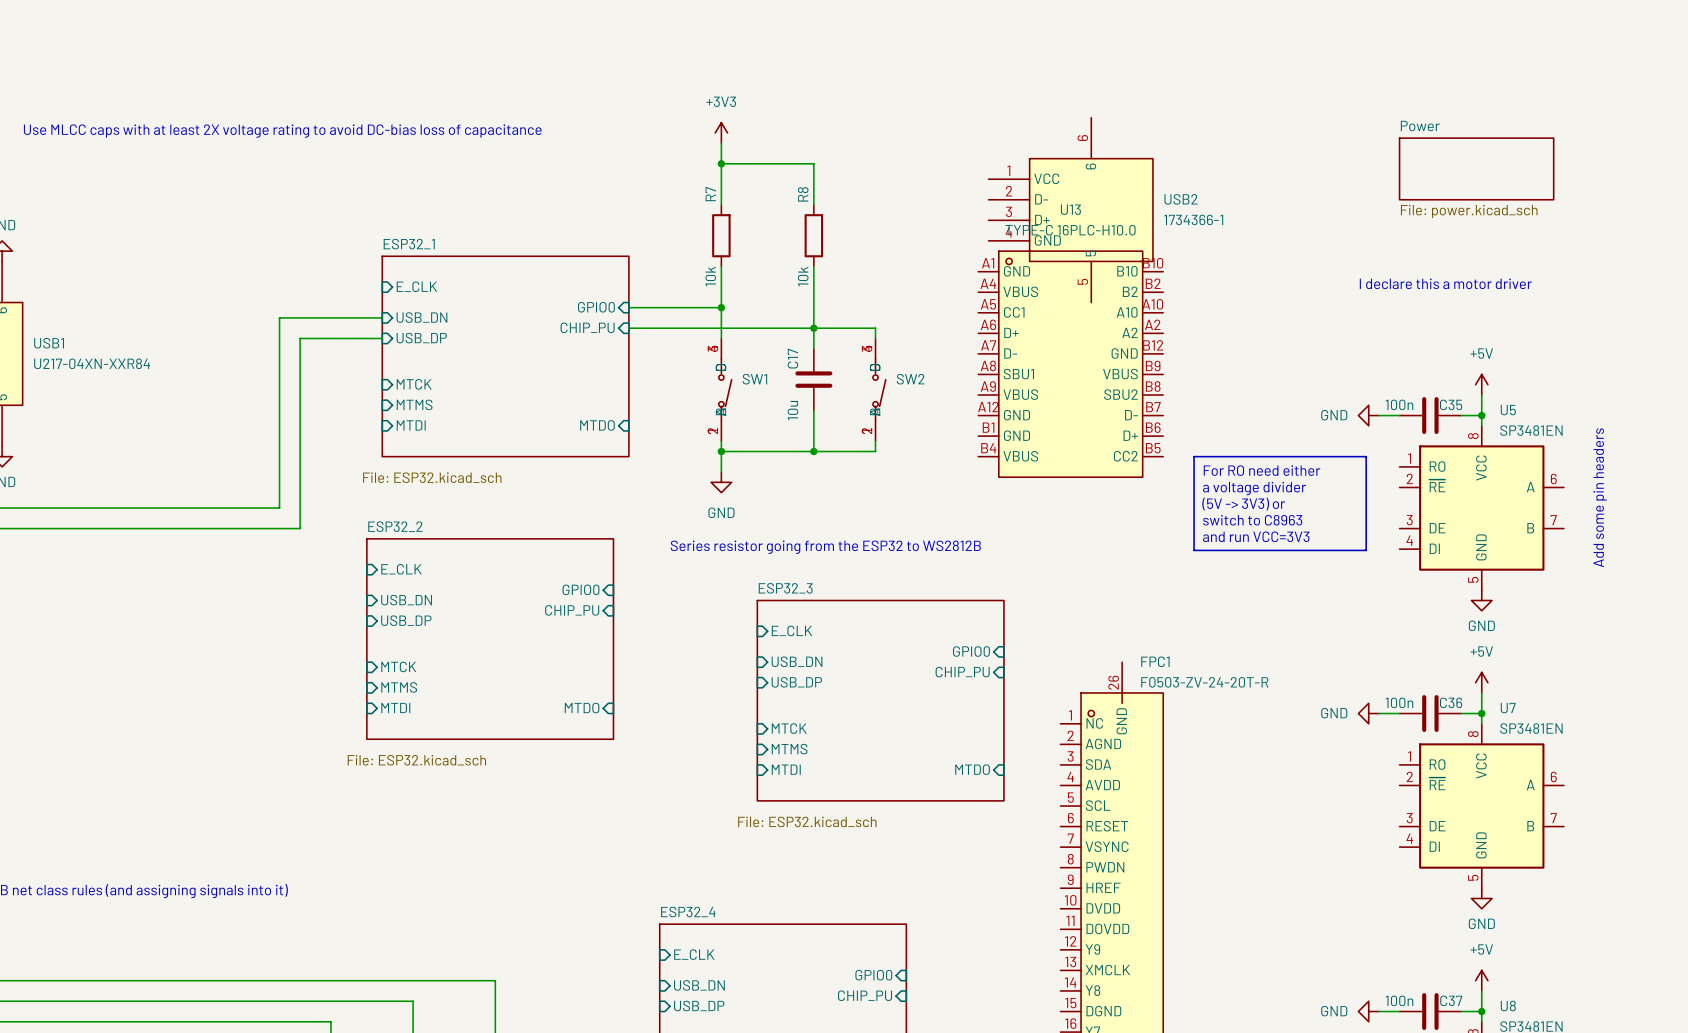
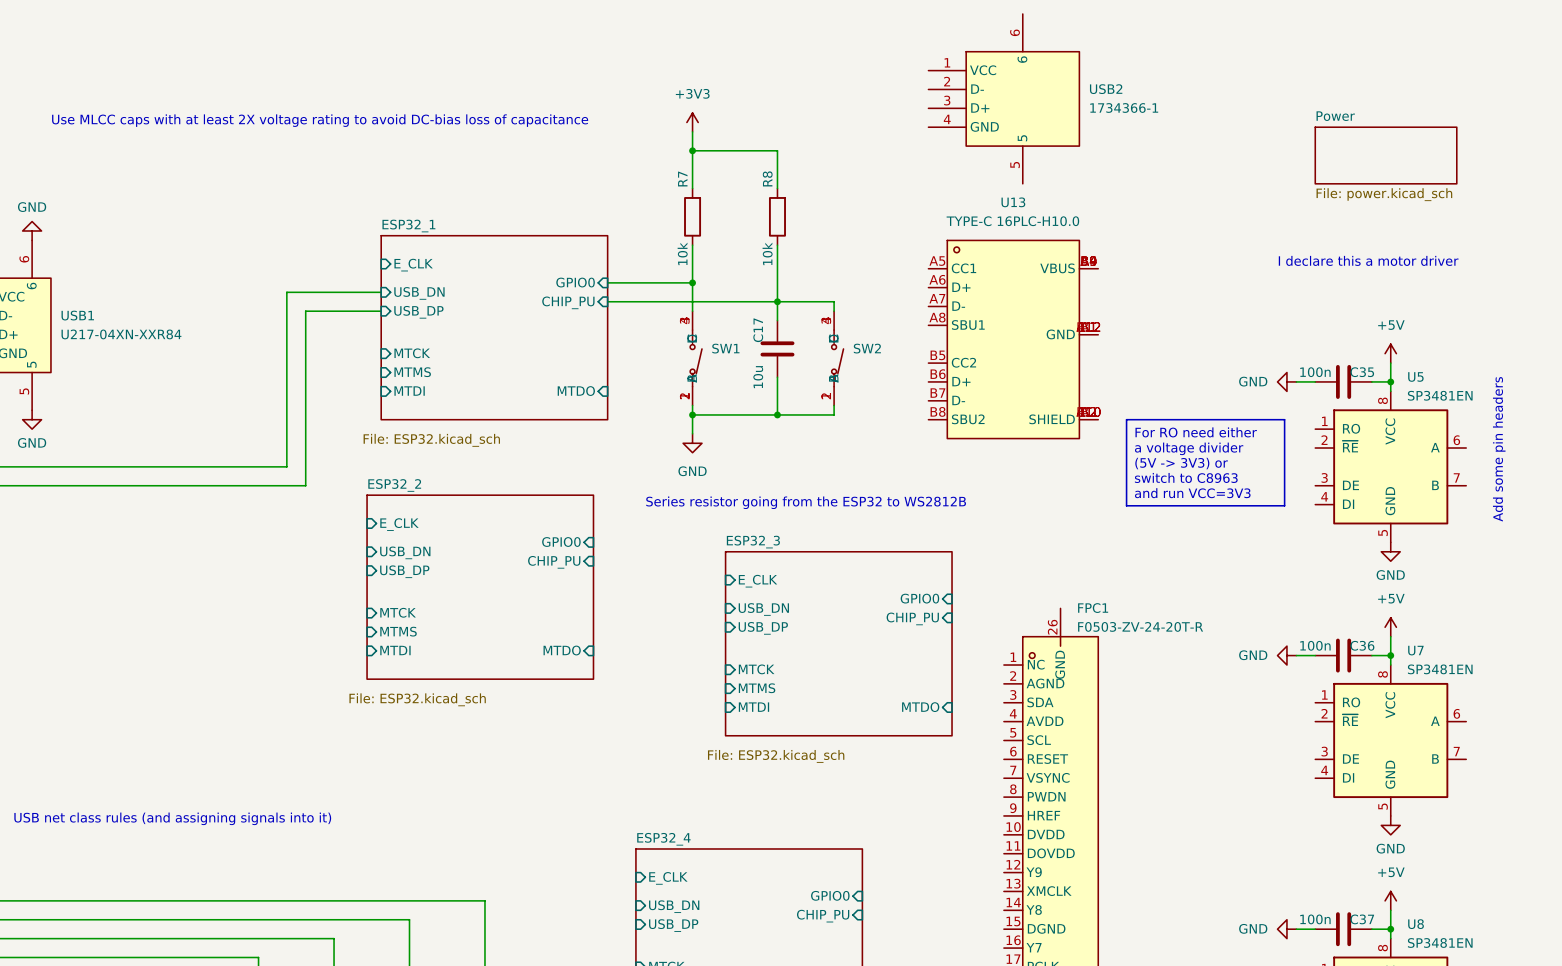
USB2 position: (1070, 210) -> (1003, 98)
U13 symbol: [978, 251, 1164, 478] -> [928, 240, 1099, 439]

